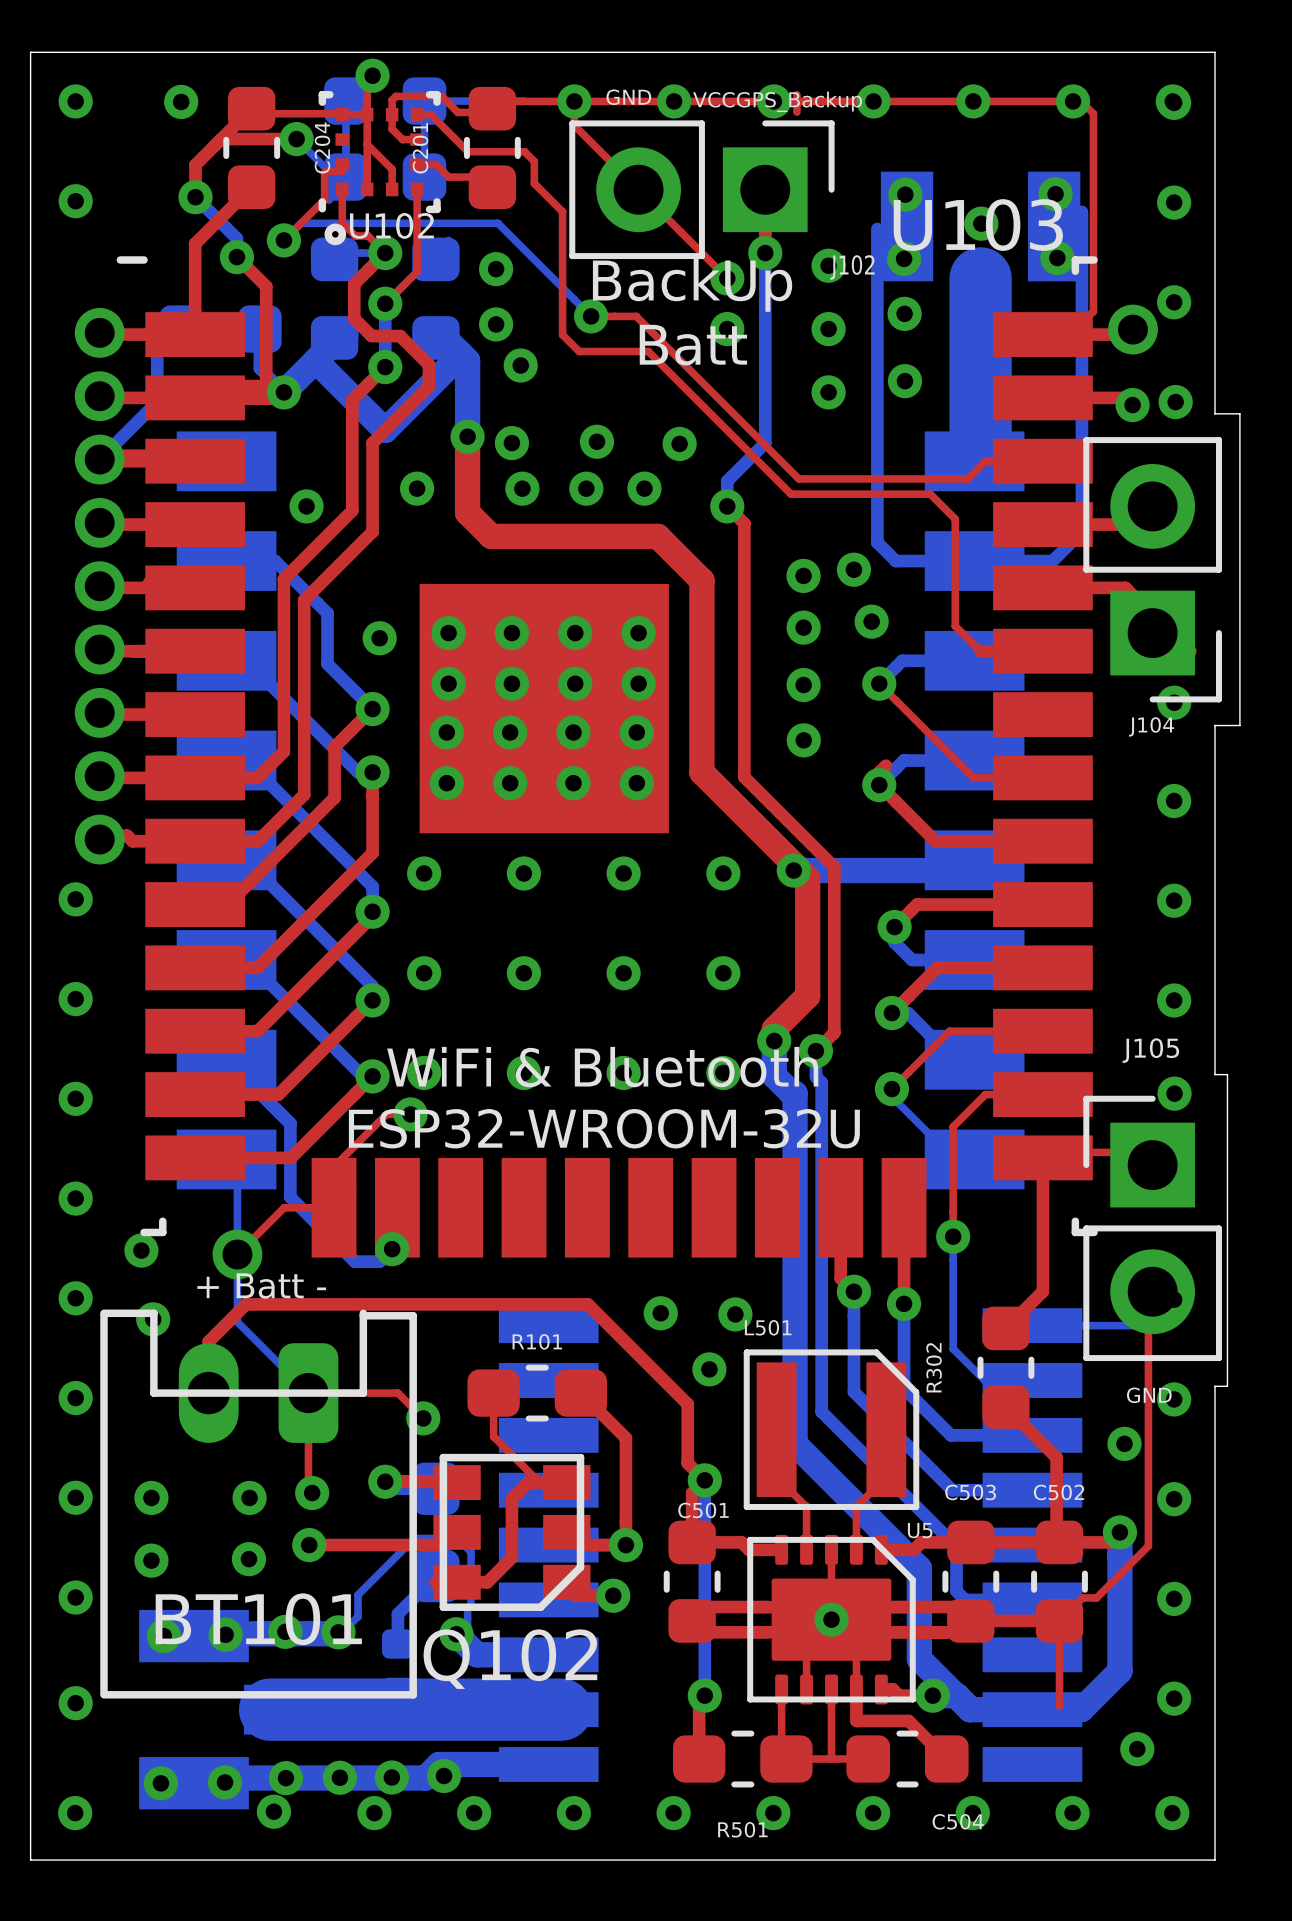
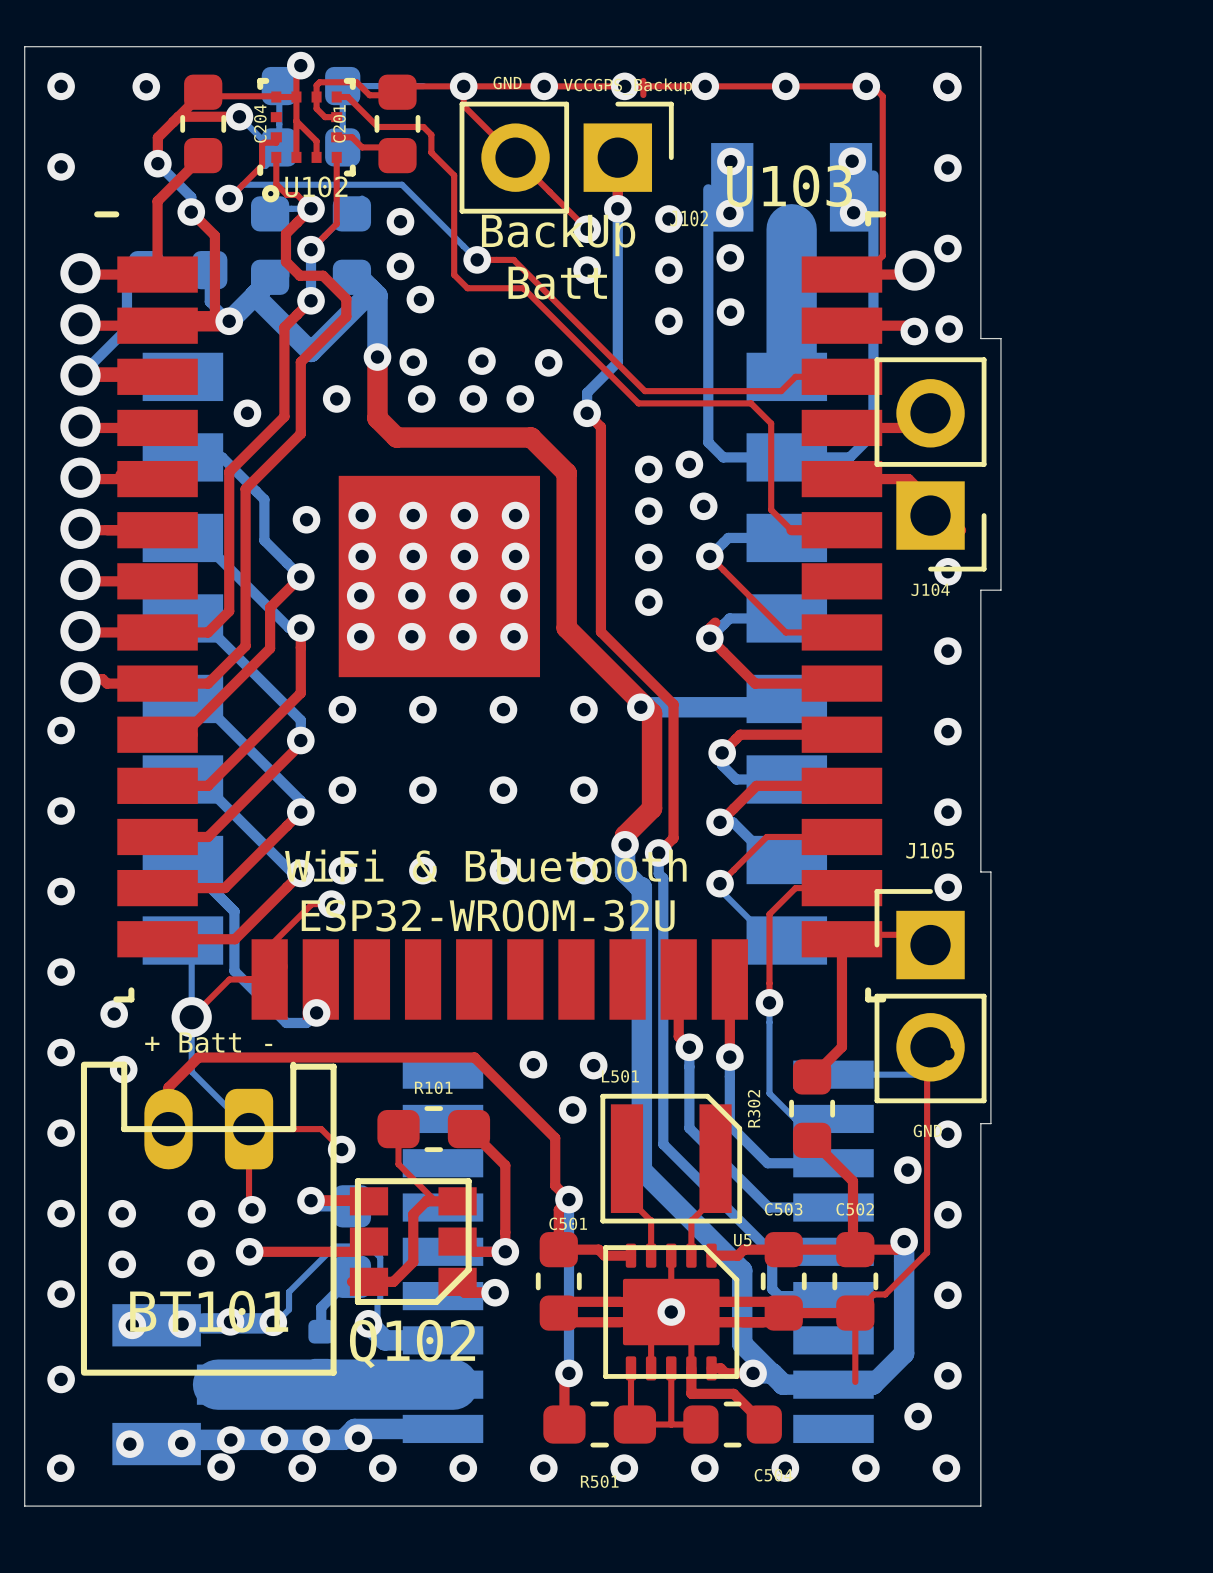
via: (981, 223) -> none

